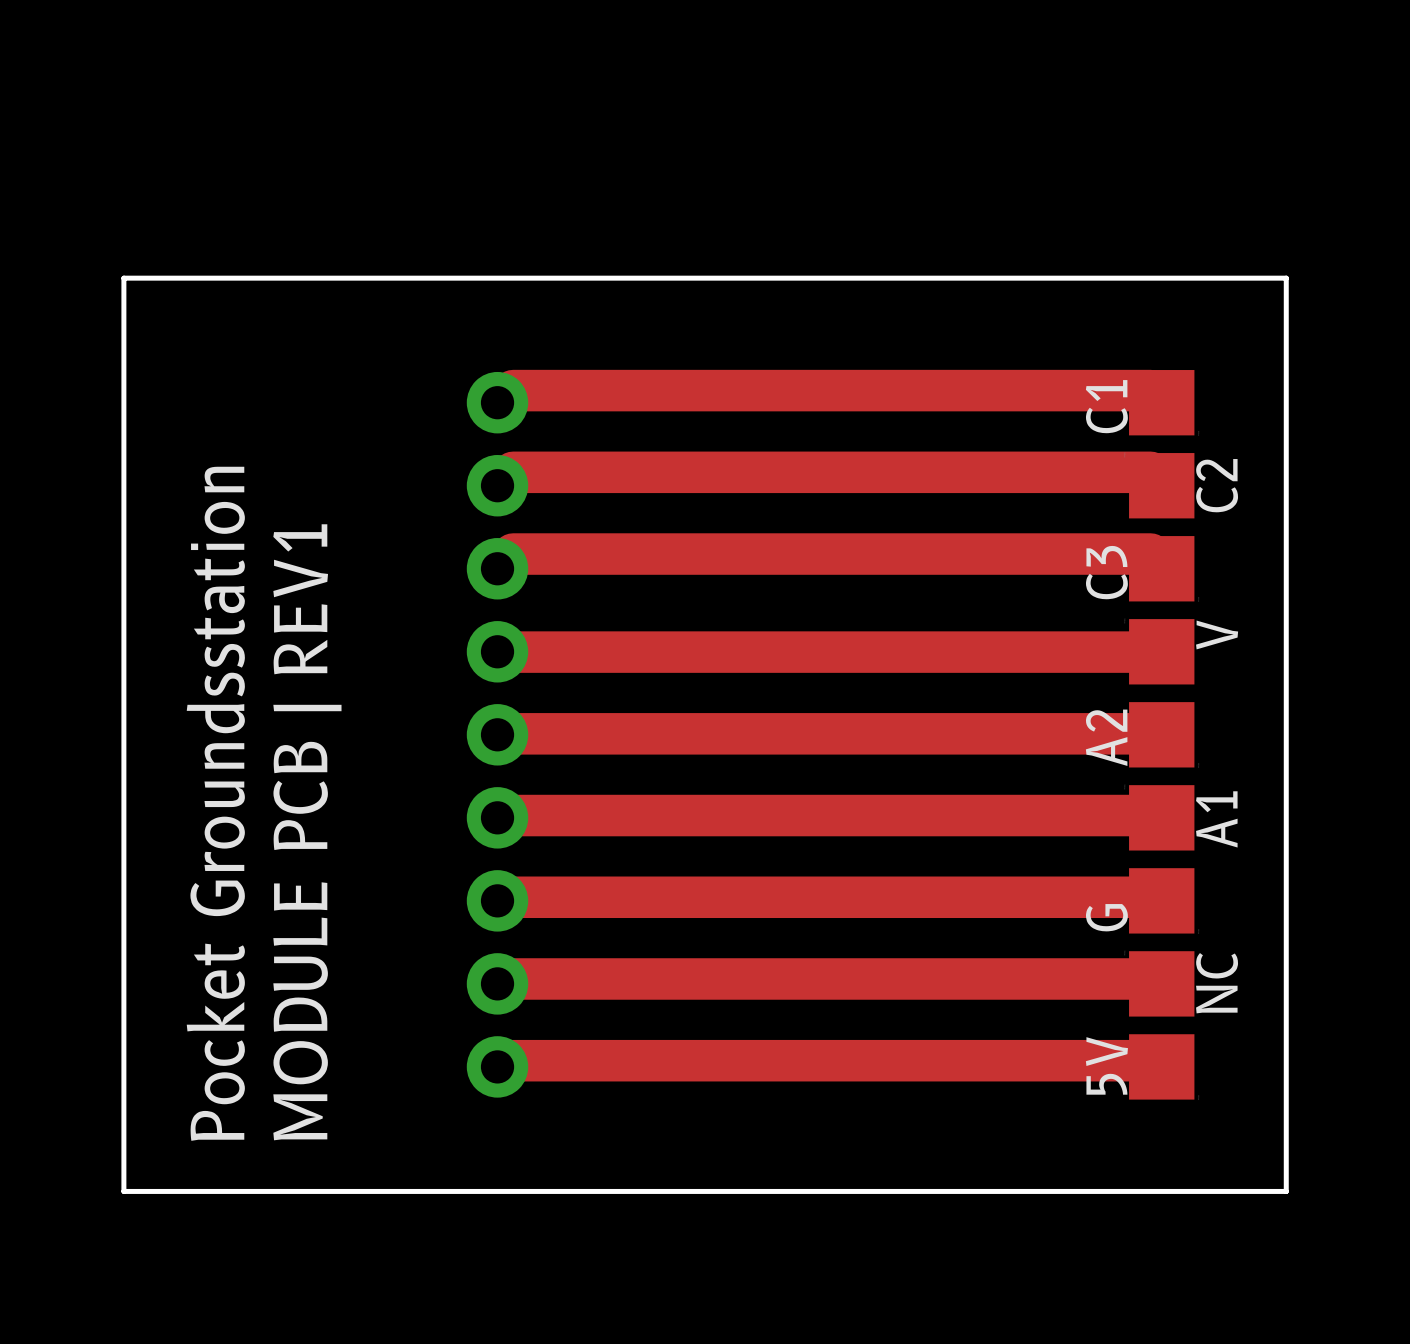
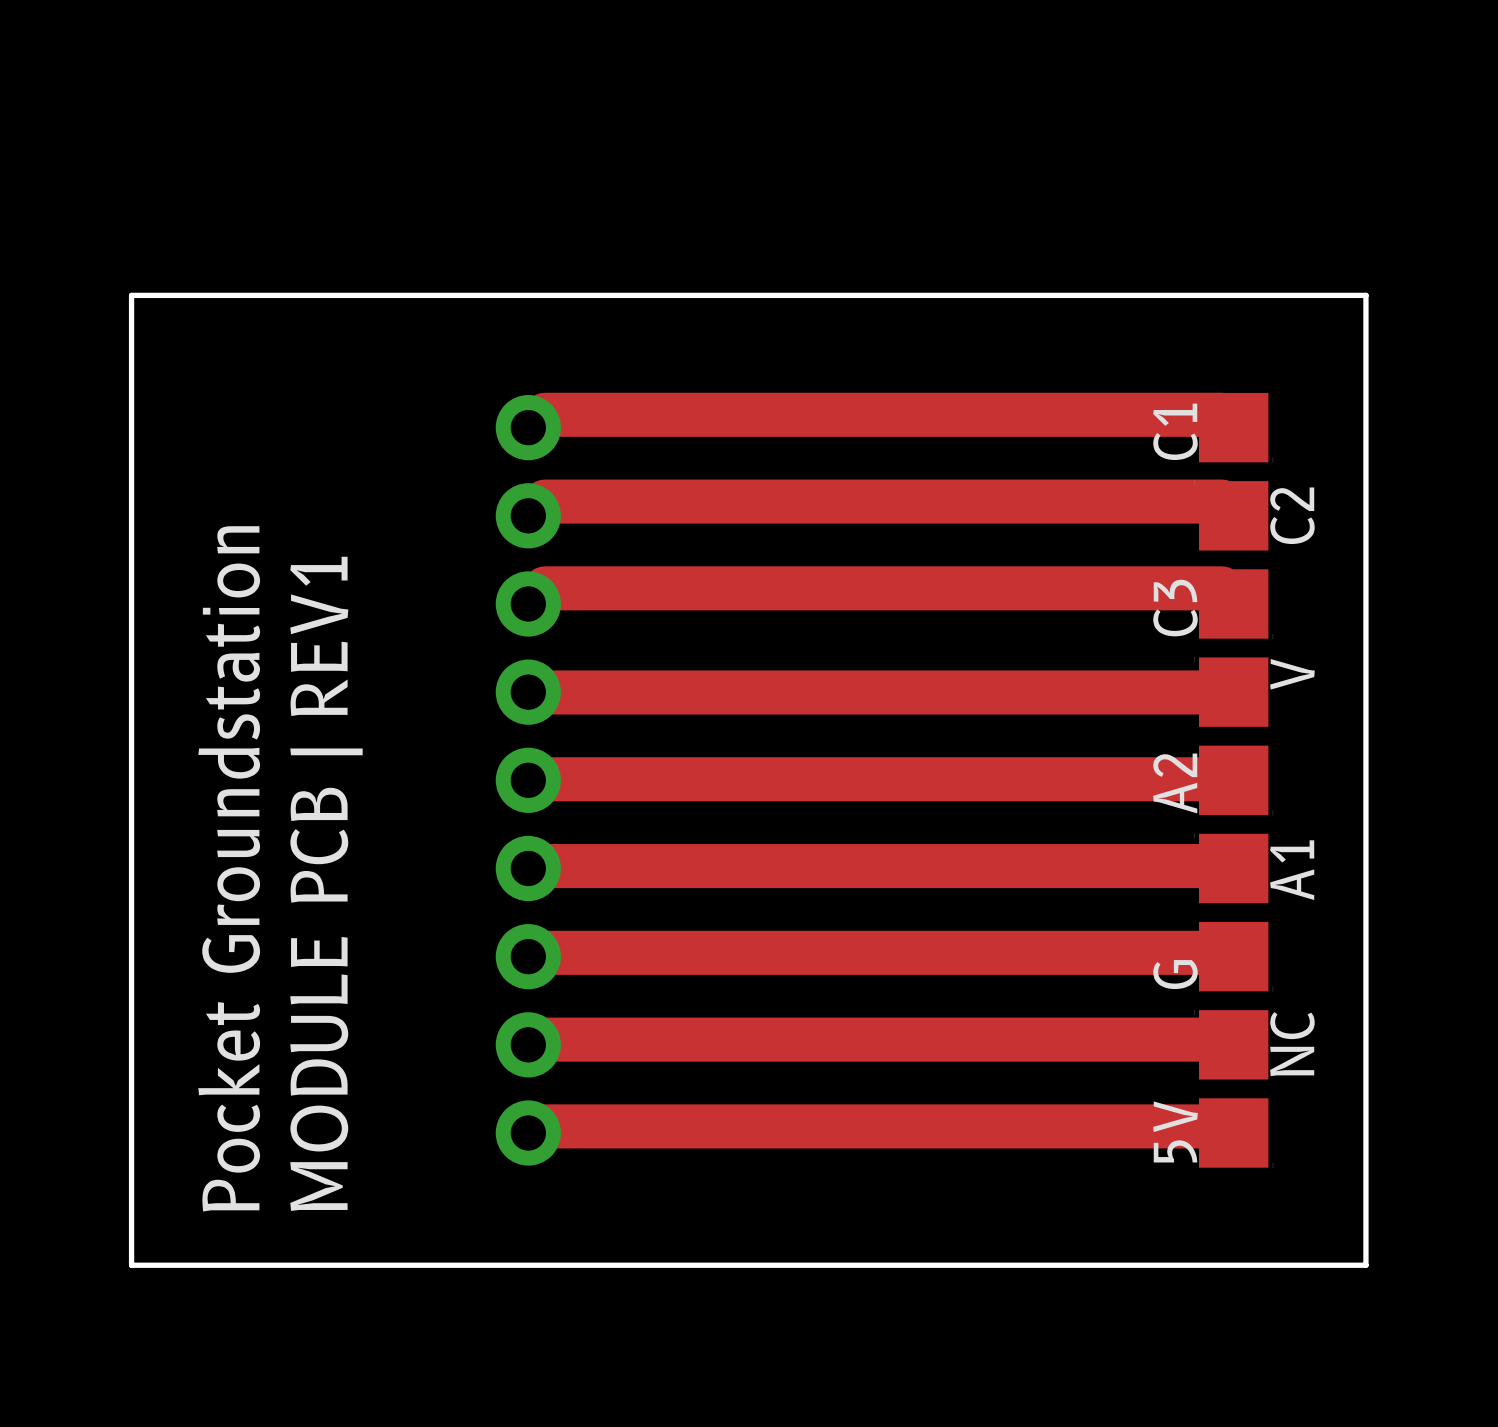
text: Pocket Groundsstation (215, 803) -> Pocket Groundstation (229, 868)

